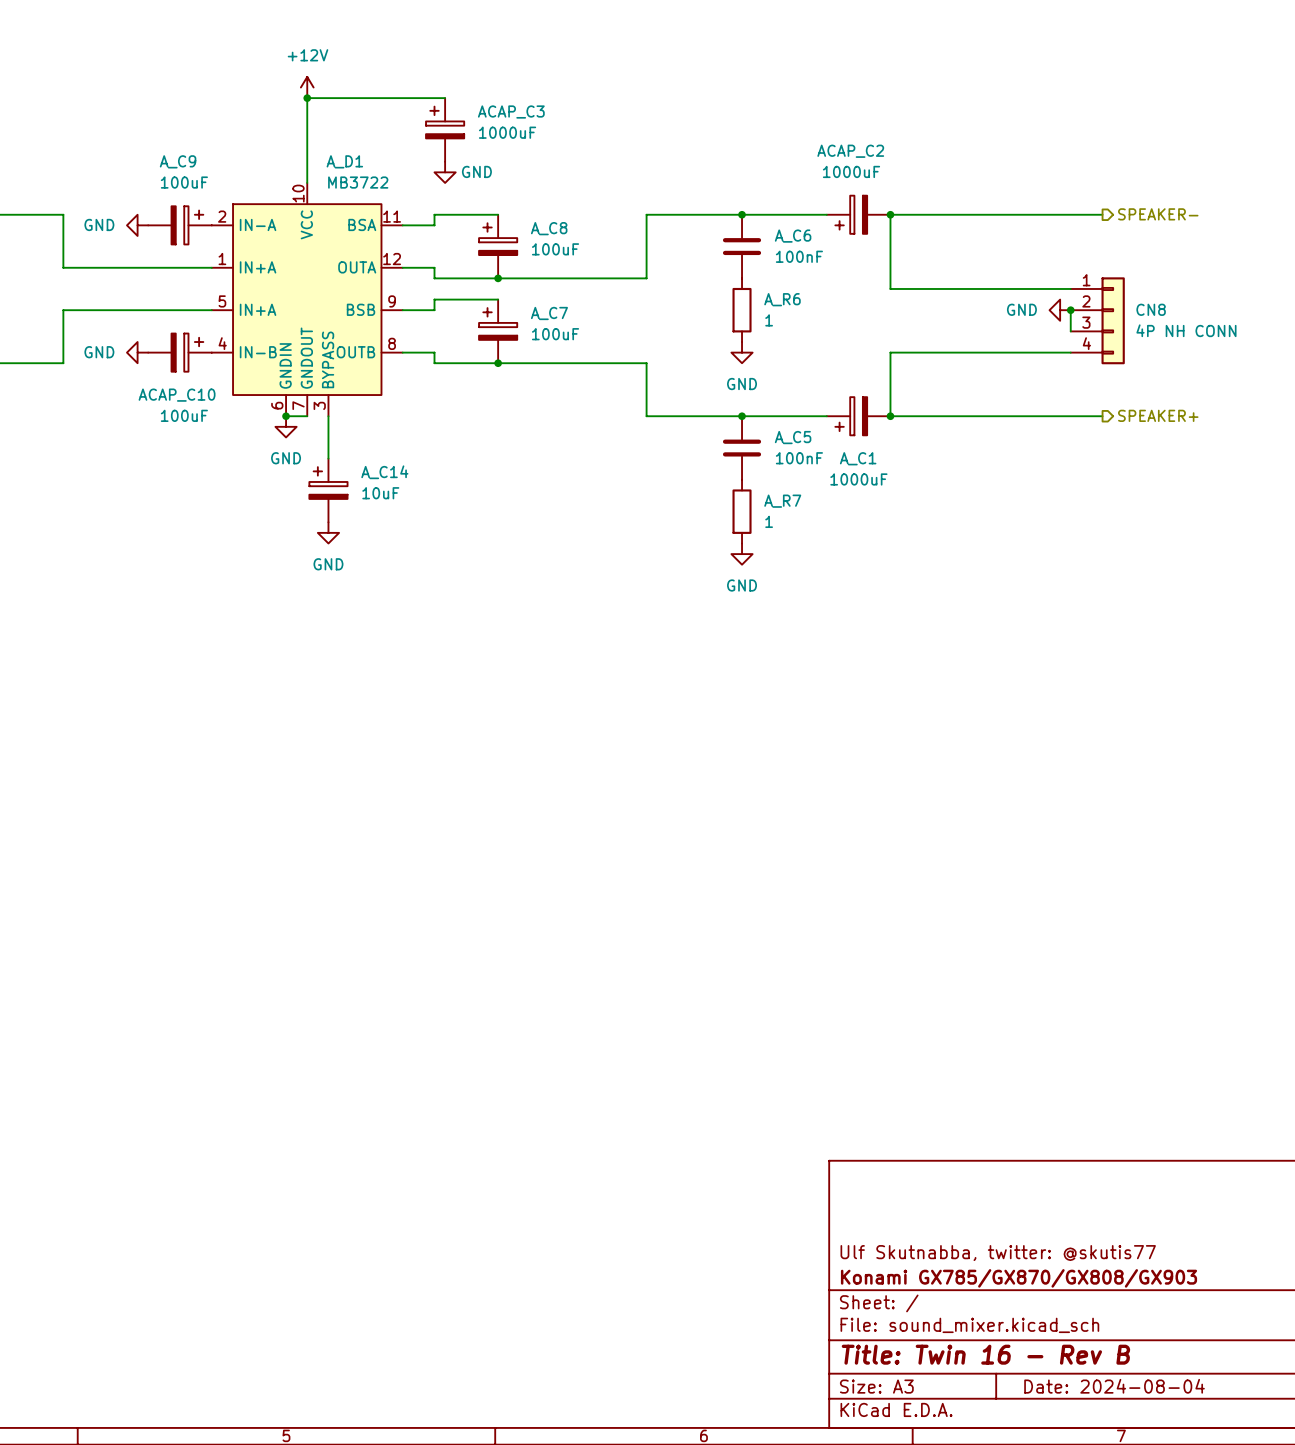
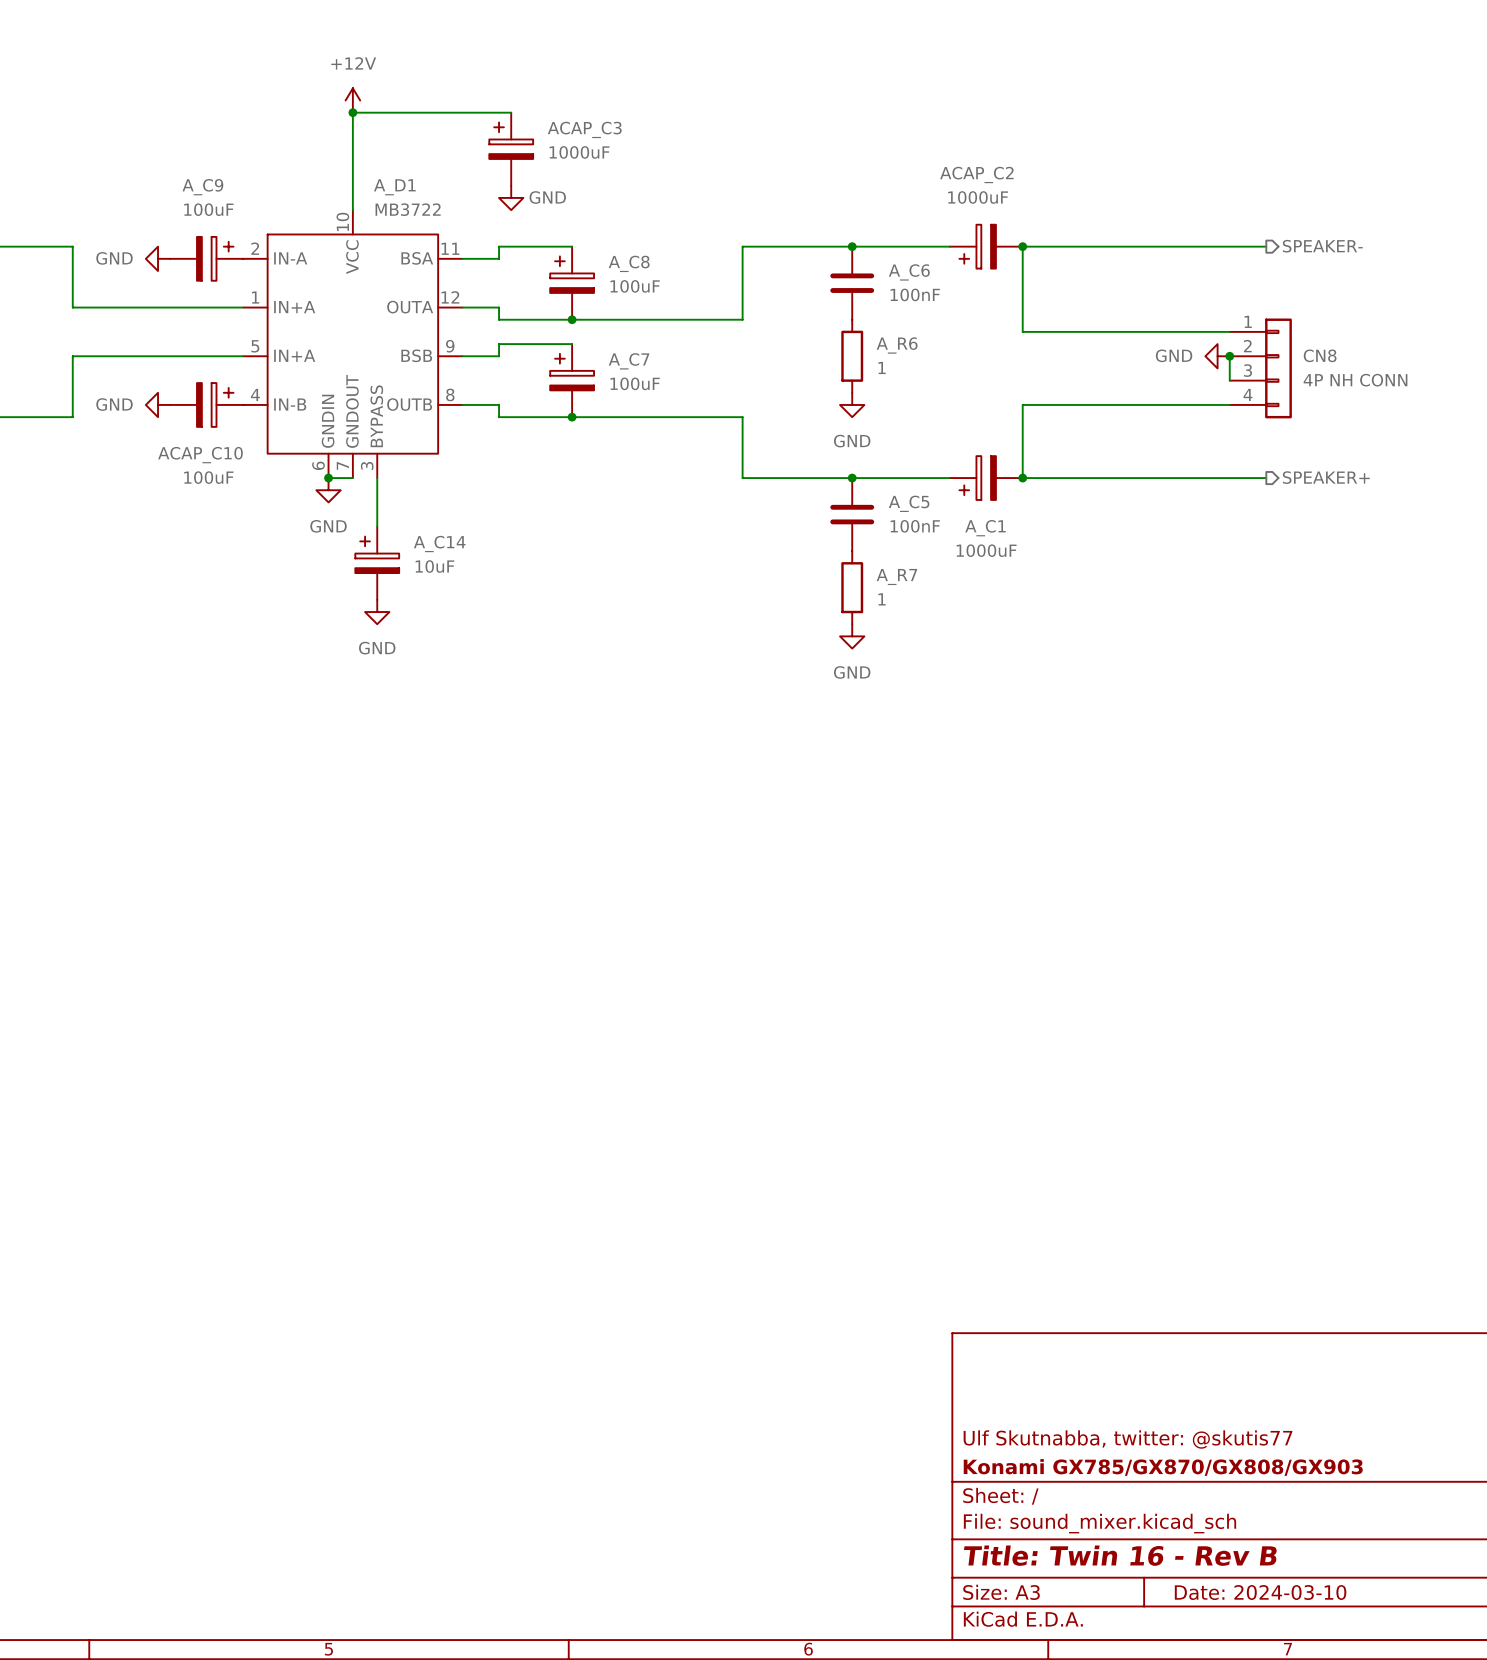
title block: Date: 2024-08-04 (1114, 1386) -> Date: 2024-03-10 (1260, 1592)

